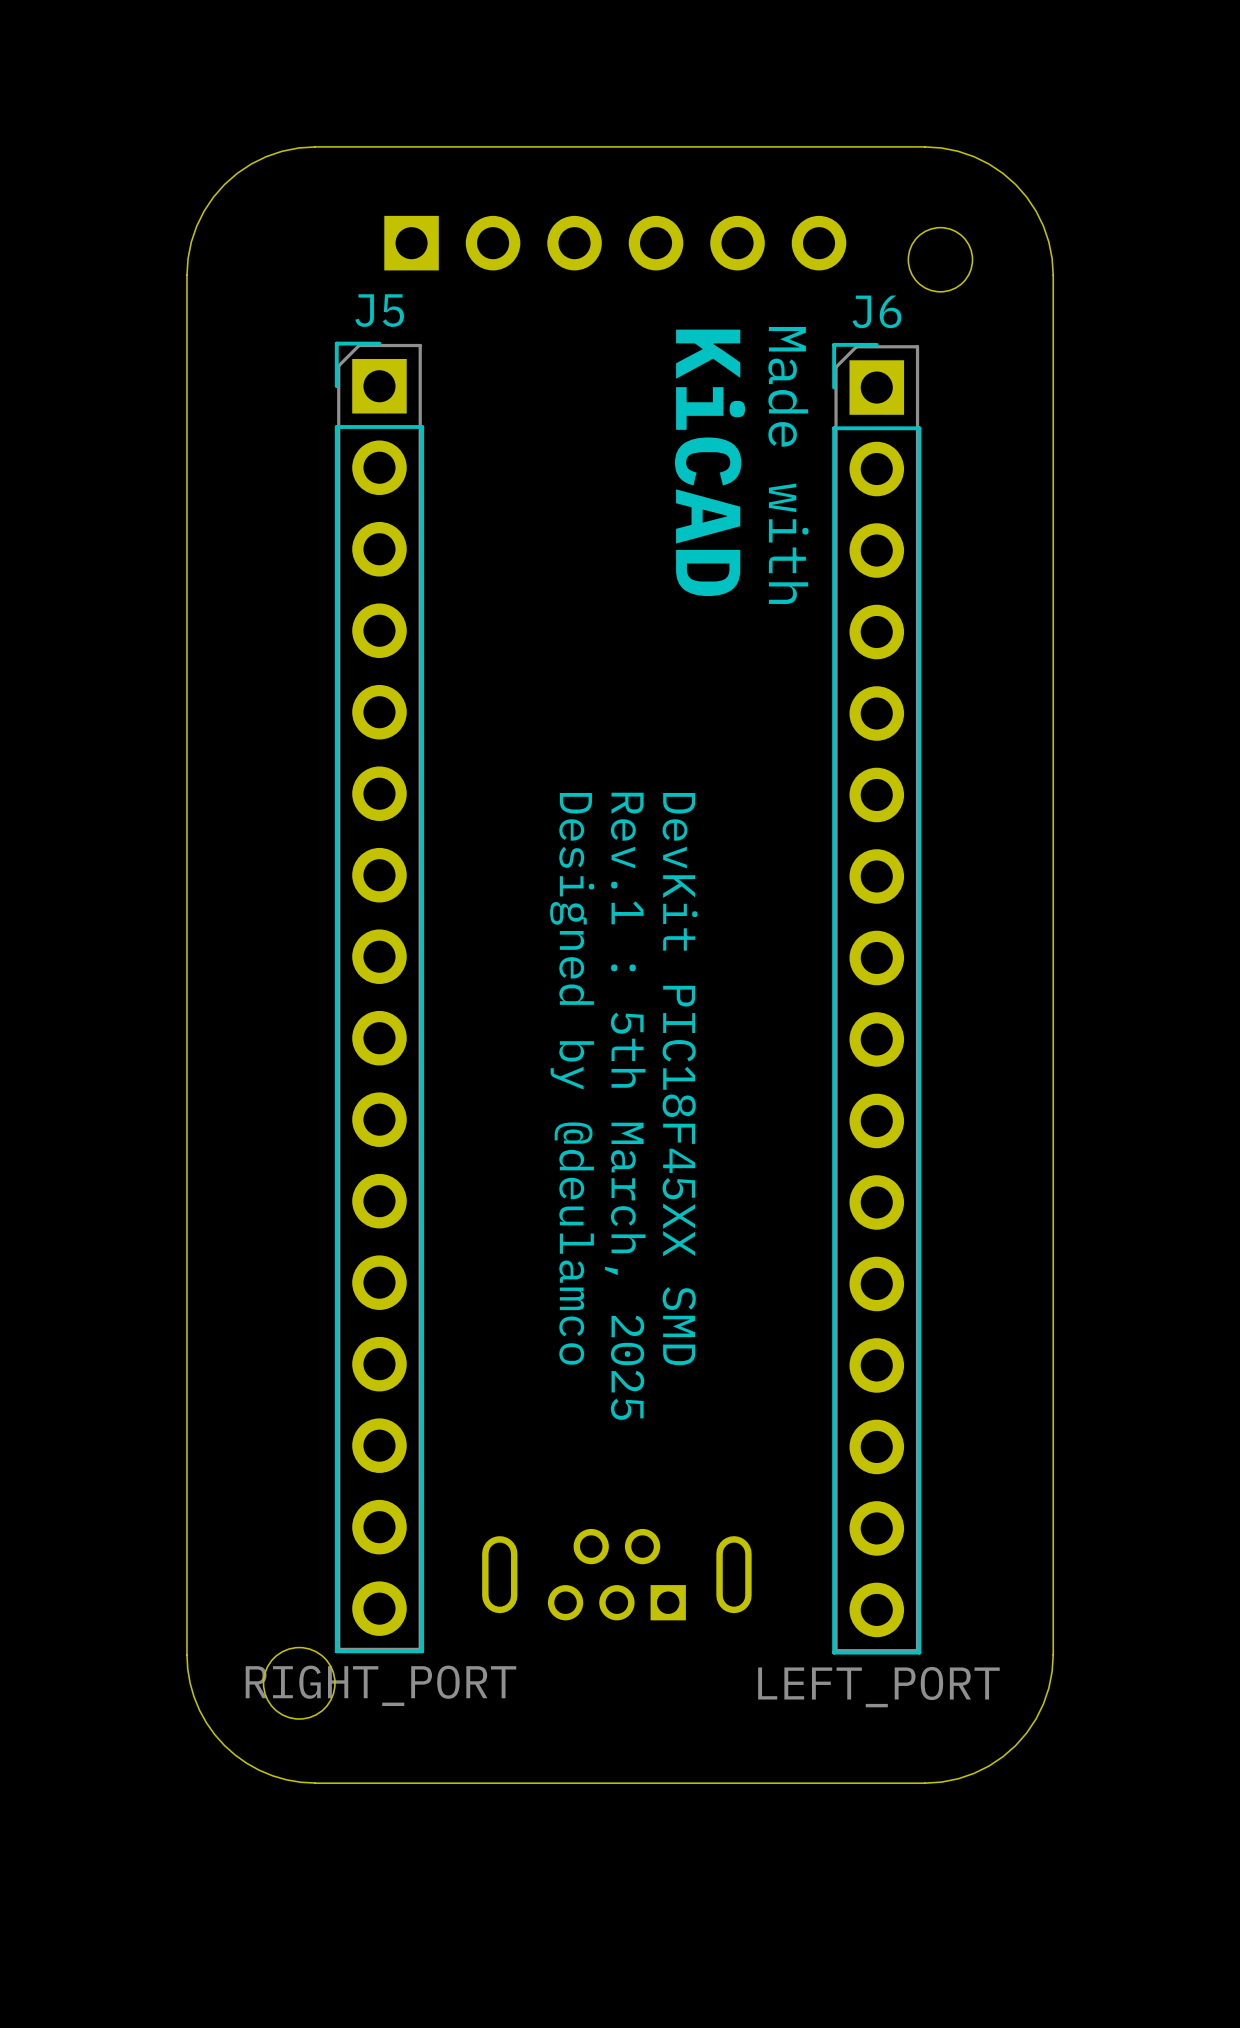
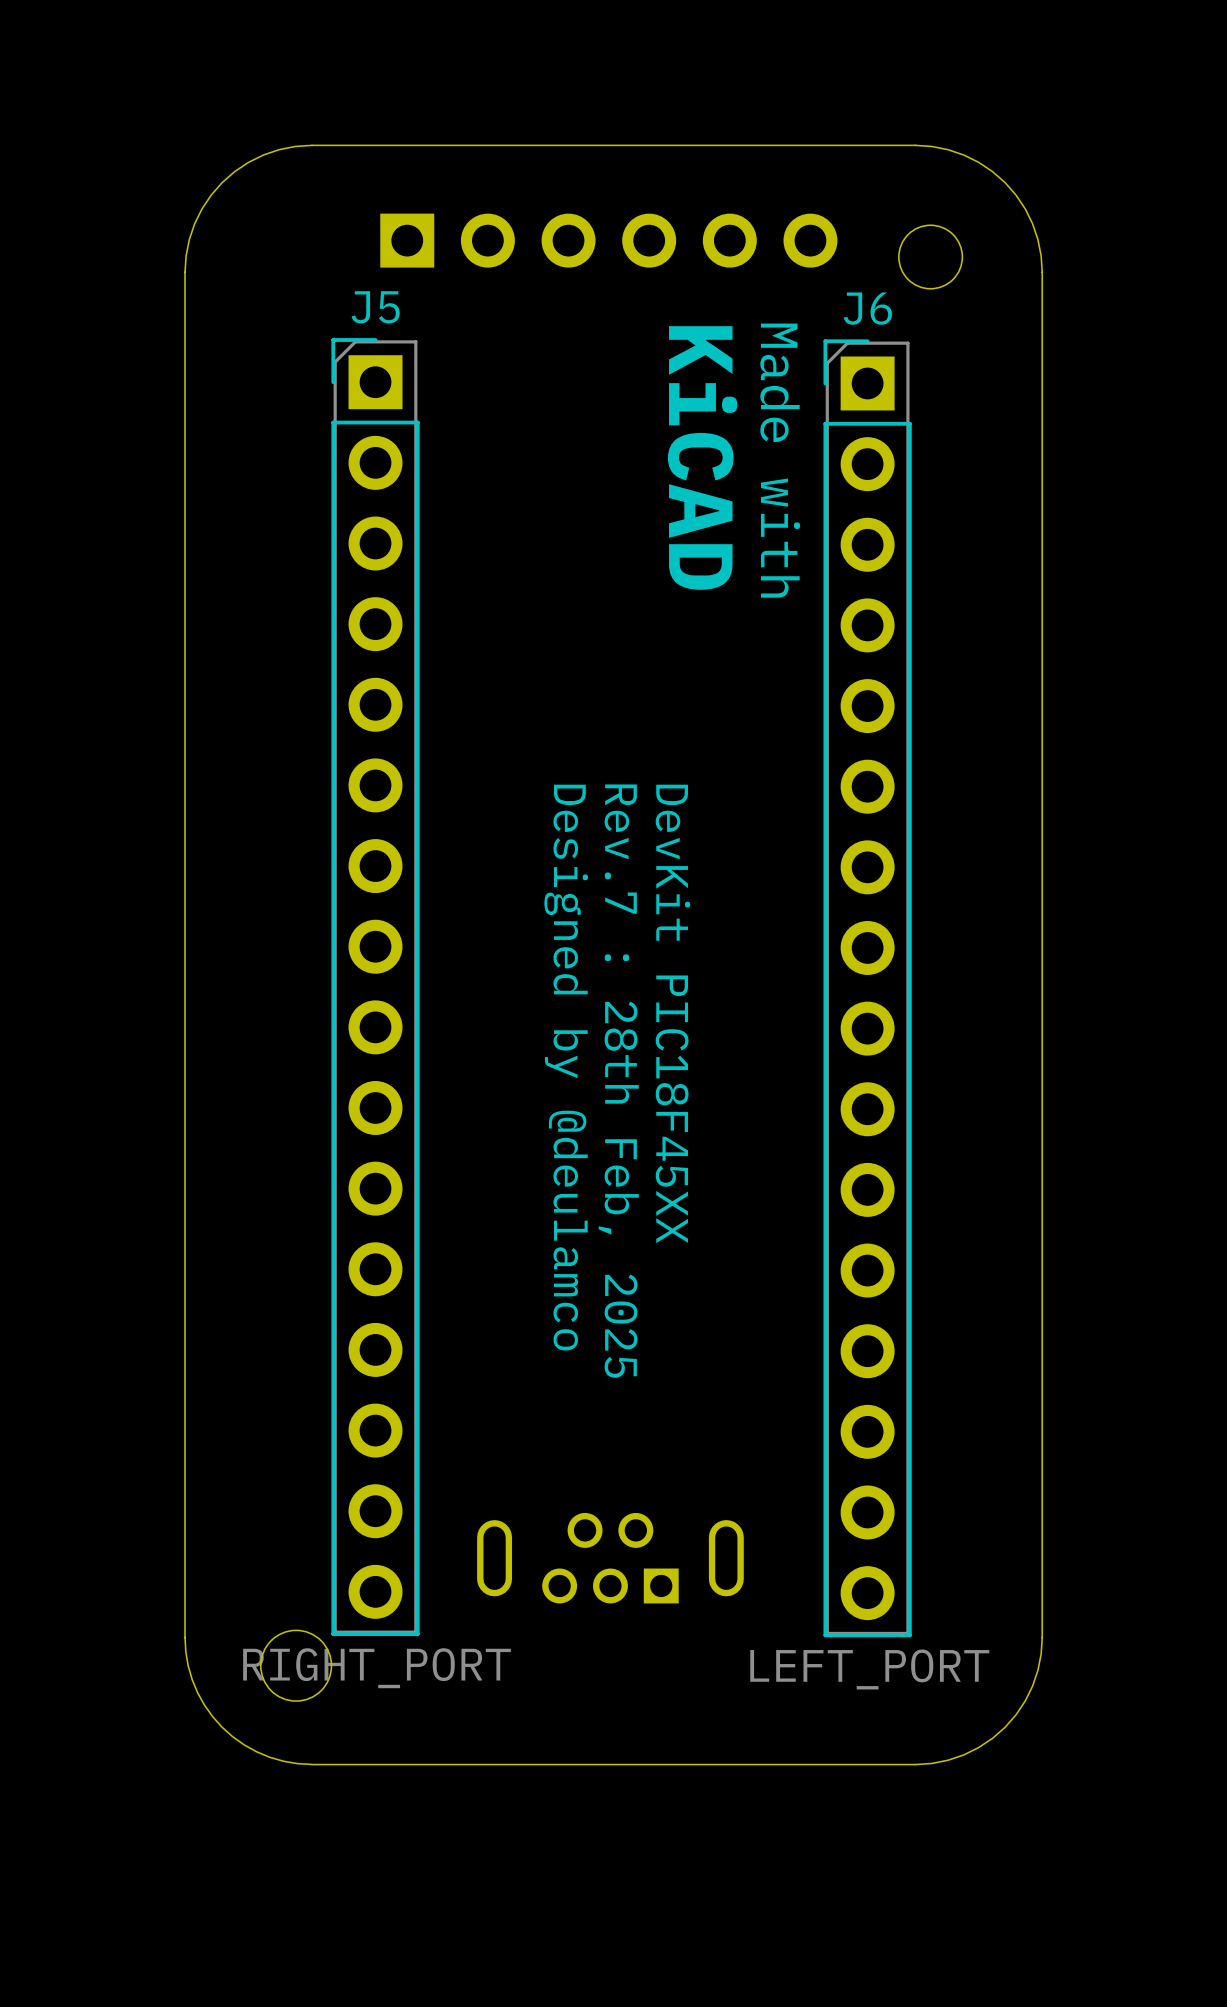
text: DevKit PIC18F45XX SMD (680, 1079) -> DevKit PIC18F45XX (672, 1013)
text: Rev.1 : 5th March, 2025 (625, 1106) -> Rev.7 : 28th Feb, 2025 (618, 1081)

